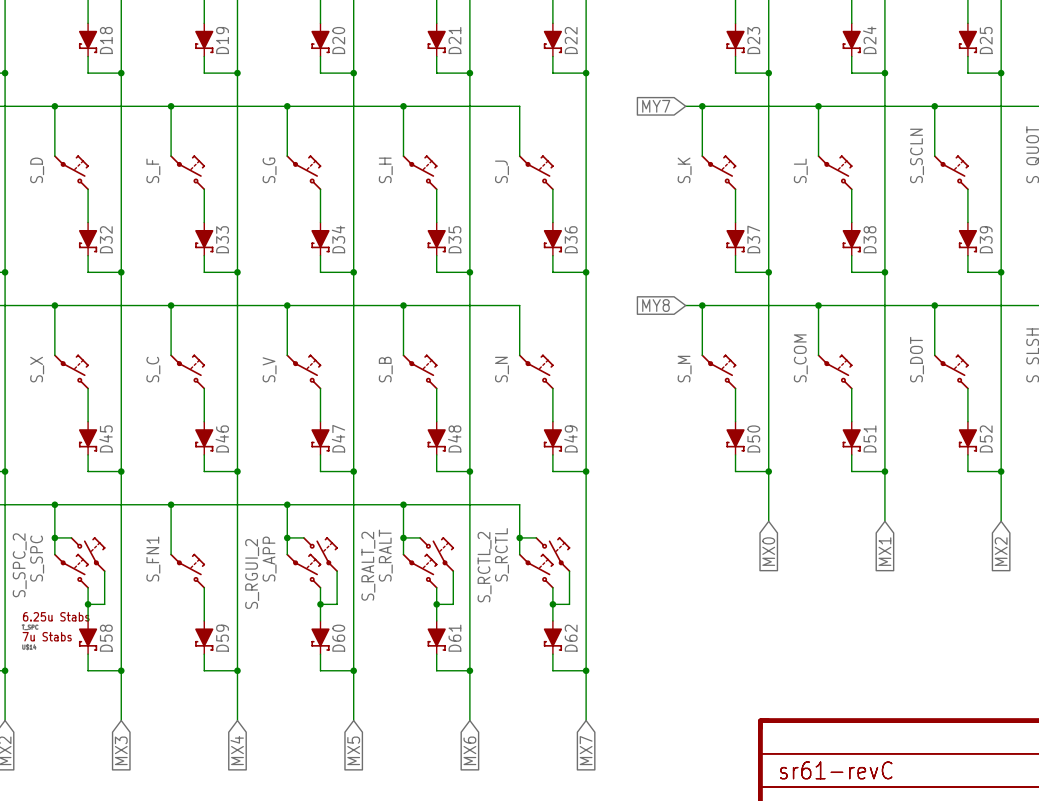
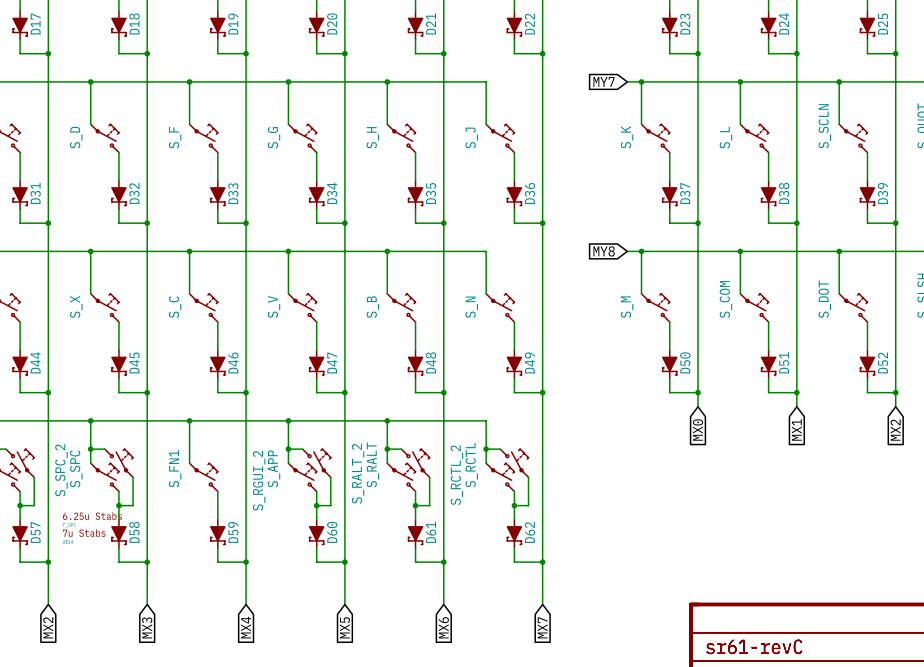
wire: (768, 488) (768, 521) -> none
wire: (884, 488) (884, 521) -> none
wire: (1001, 488) (1001, 521) -> none
global label position: MX0 (768, 551) -> MX0 (697, 430)
global label position: MX1 (884, 551) -> MX1 (796, 429)
global label position: MX2 (1001, 551) -> MX2 (895, 430)

